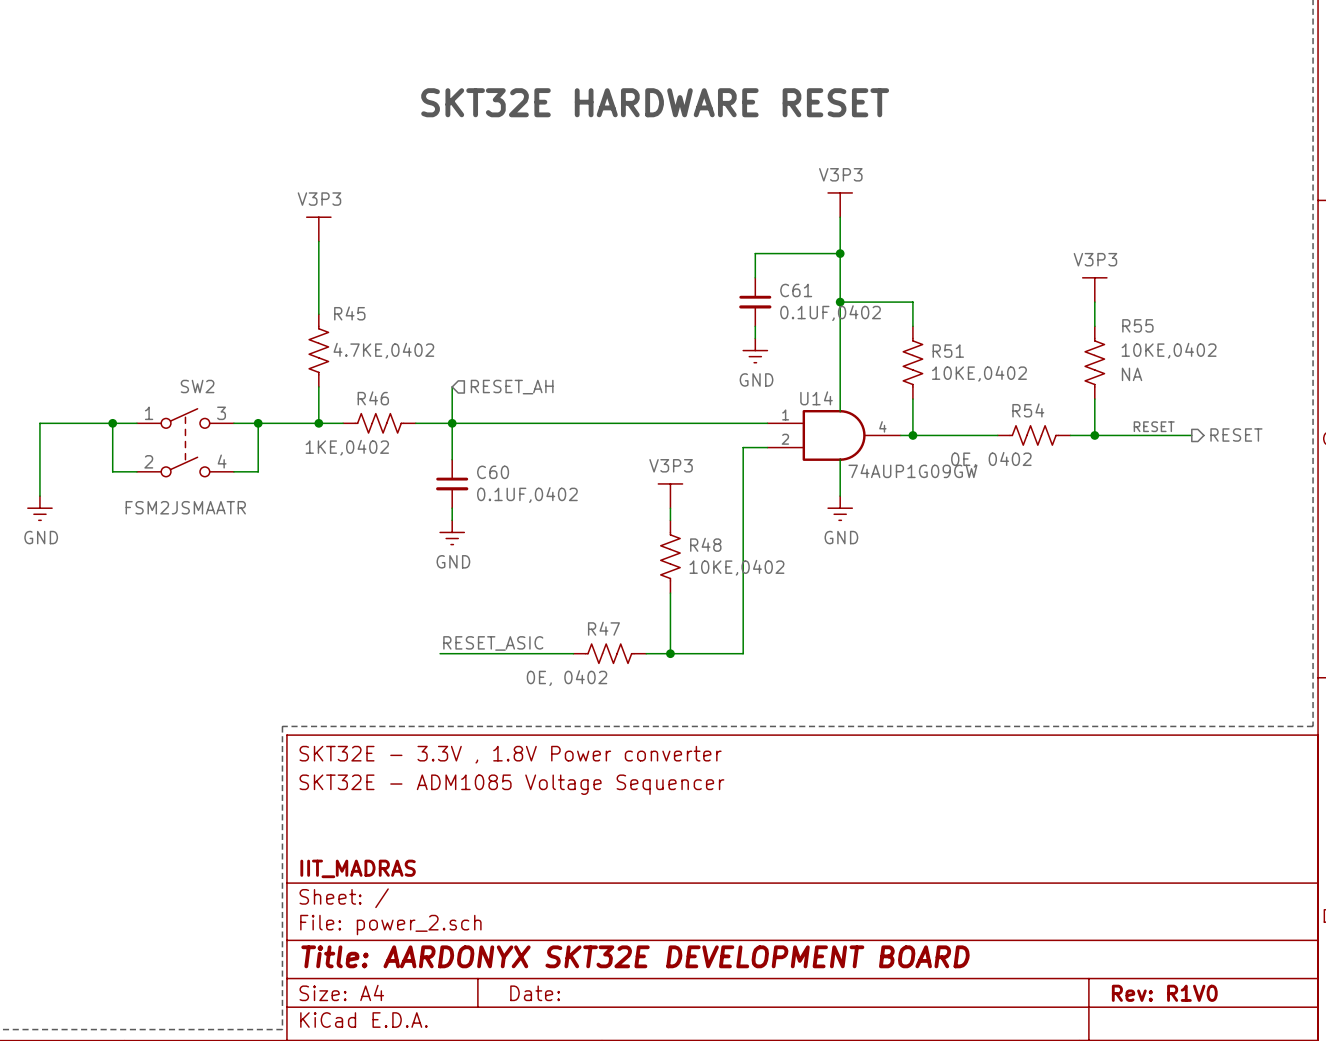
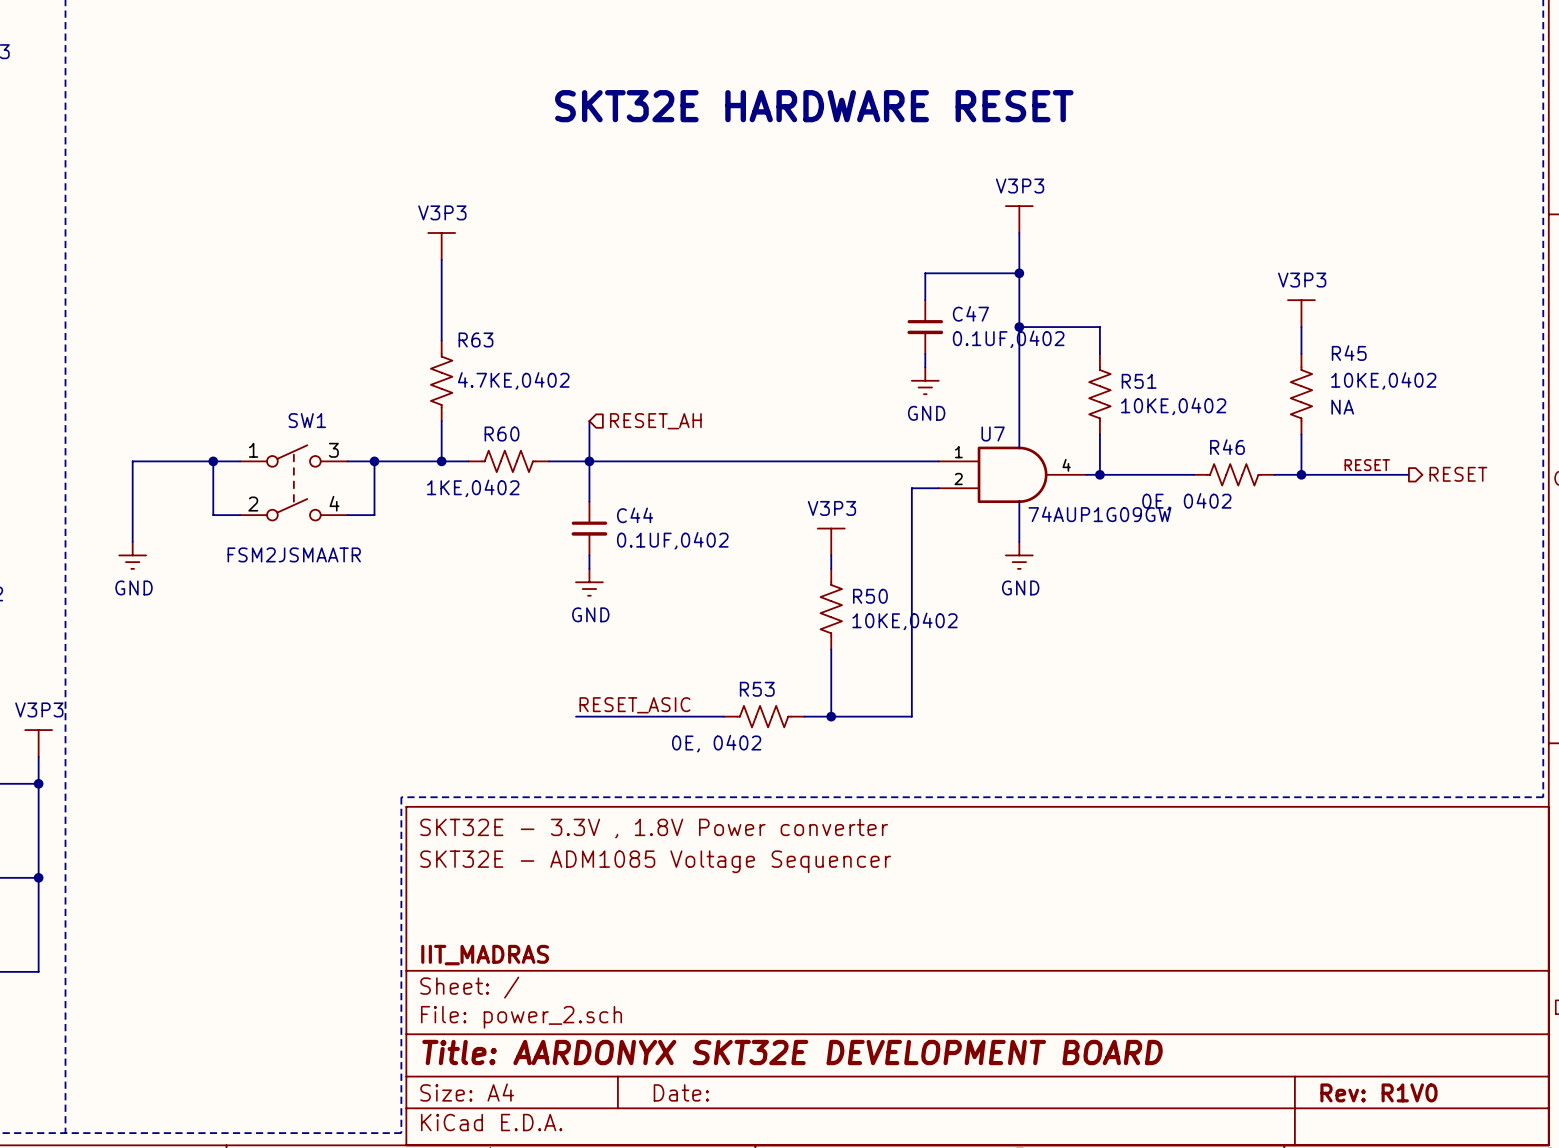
C61 name: C61 (796, 290) -> C47 (970, 313)
R45 name: R45 (349, 313) -> R63 (475, 339)
R55 name: R55 (1137, 325) -> R45 (1349, 353)
SW2 name: SW2 (197, 386) -> SW1 (307, 420)
R46 name: R46 (373, 398) -> R60 (502, 434)
U14 name: U14 (816, 398) -> U7 (993, 434)
R54 name: R54 (1028, 410) -> R46 (1227, 447)
C60 name: C60 (493, 472) -> C44 (635, 515)
R48 name: R48 (705, 544) -> R50 (870, 596)
R47 name: R47 (603, 628) -> R53 (757, 689)

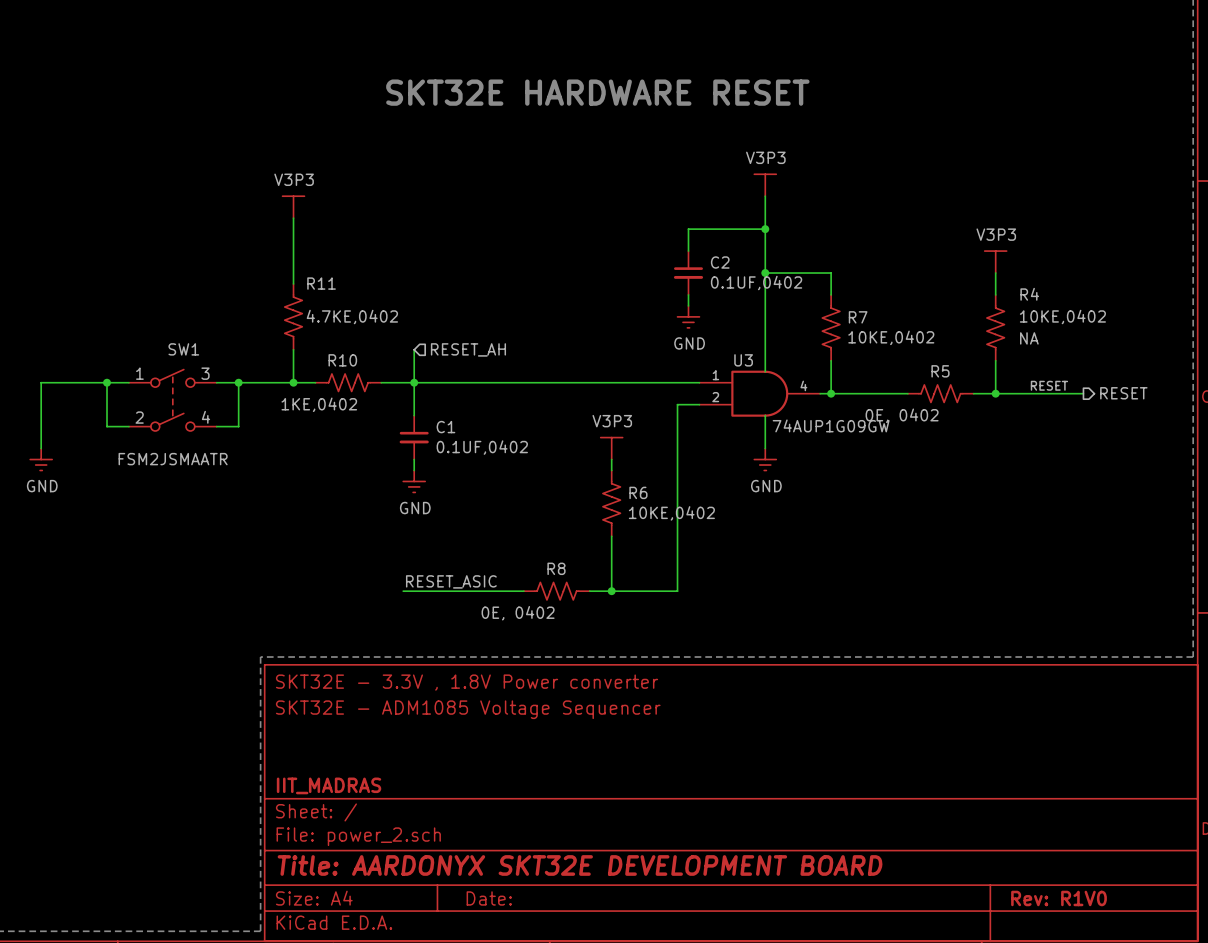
C47 name: C47 (970, 313) -> C2 (720, 262)
R63 name: R63 (475, 339) -> R11 (321, 283)
R45 name: R45 (1349, 353) -> R4 (1029, 294)
R51 name: R51 (1139, 381) -> R7 (858, 317)
R60 name: R60 (502, 434) -> R10 (342, 360)
U7 name: U7 (993, 434) -> U3 (743, 360)
R46 name: R46 (1227, 447) -> R5 (940, 371)
C44 name: C44 (635, 515) -> C1 (445, 427)
R50 name: R50 (870, 596) -> R6 (638, 492)
R53 name: R53 (757, 689) -> R8 (556, 568)

